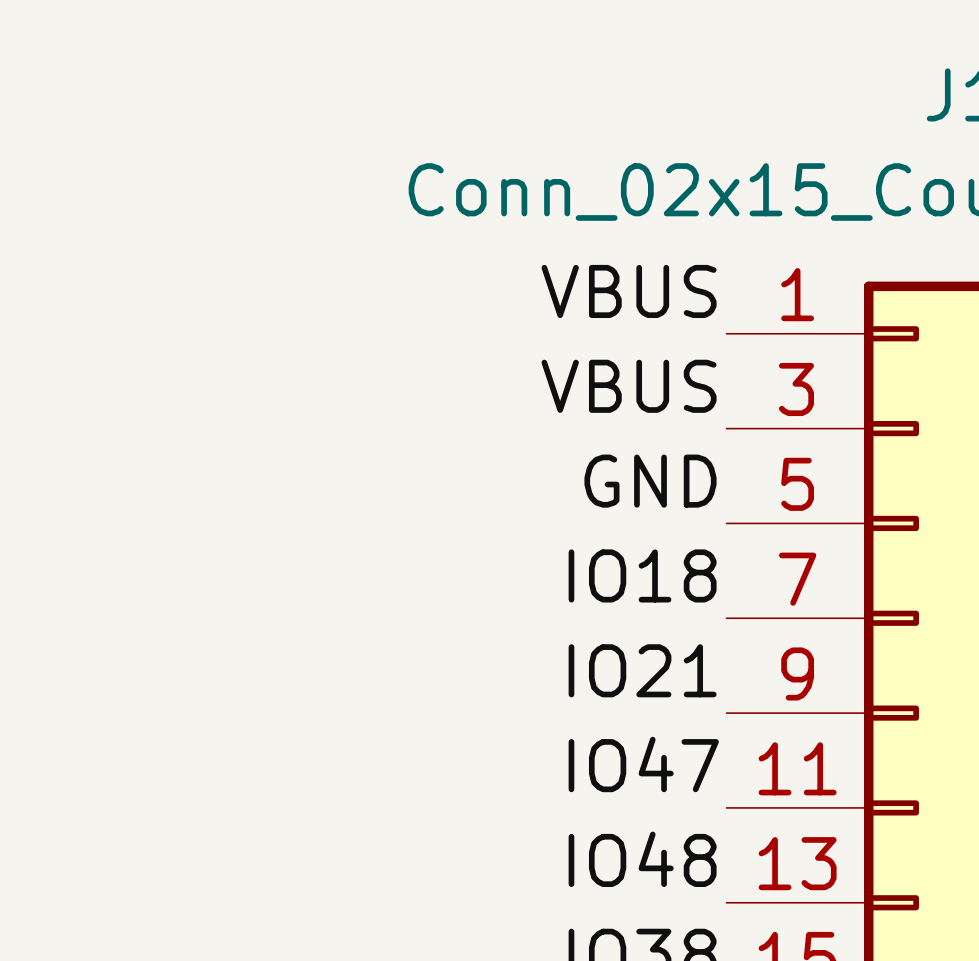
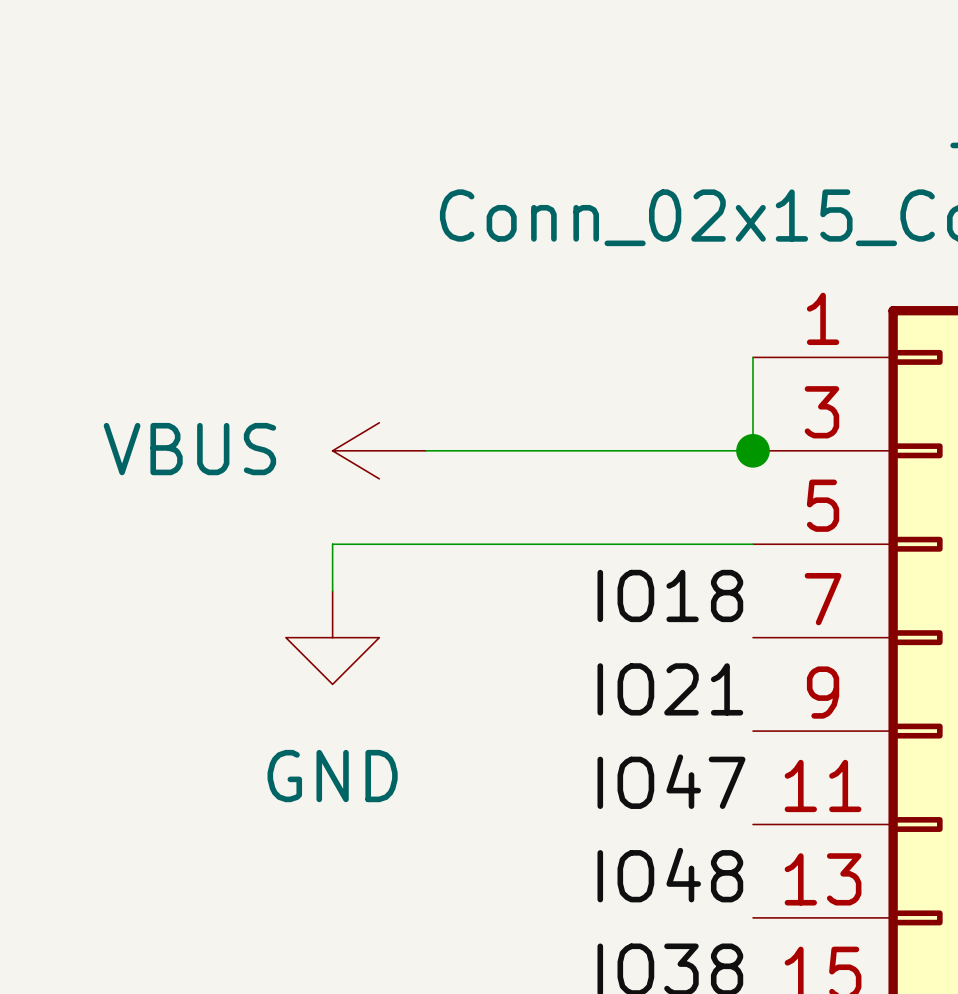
label: VBUS (629, 291) -> none
wire: none -> (752, 357) (752, 450) (426, 450)
label: VBUS (629, 386) -> none
power symbol: none -> VBUS (379, 450)
junction: none -> (752, 450)
label: GND (650, 481) -> none
wire: none -> (752, 544) (332, 544) (332, 590)
power symbol: none -> GND (332, 637)

